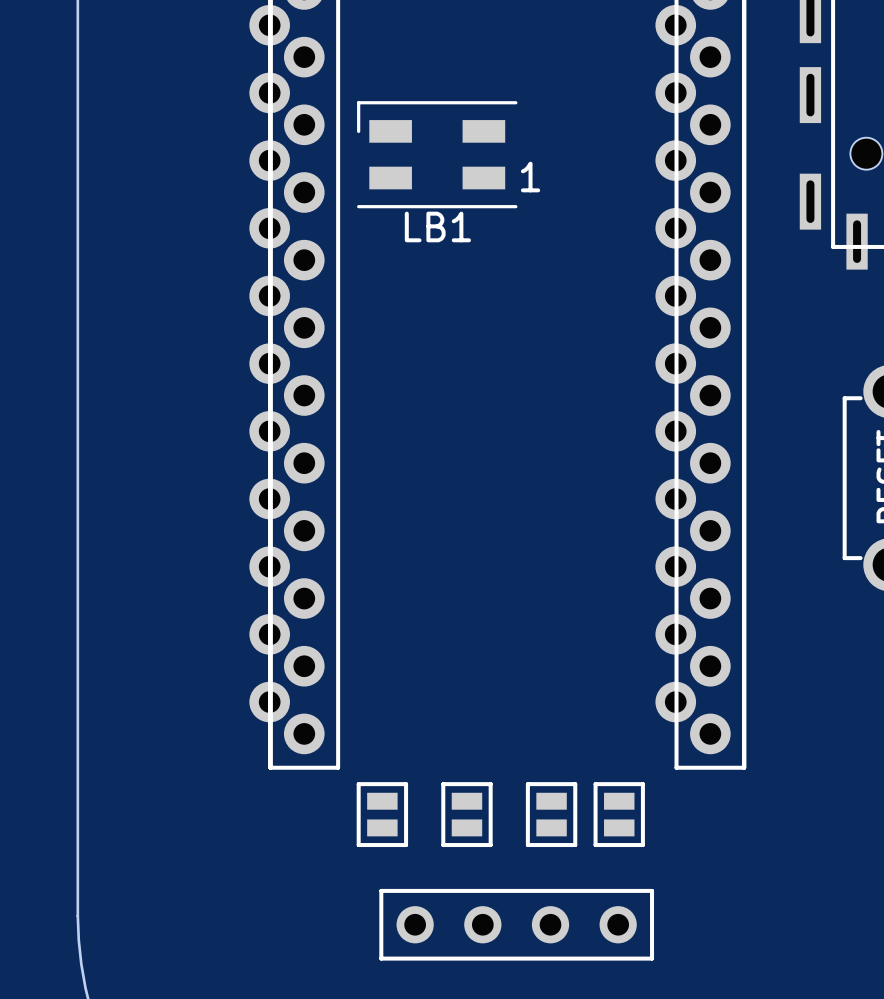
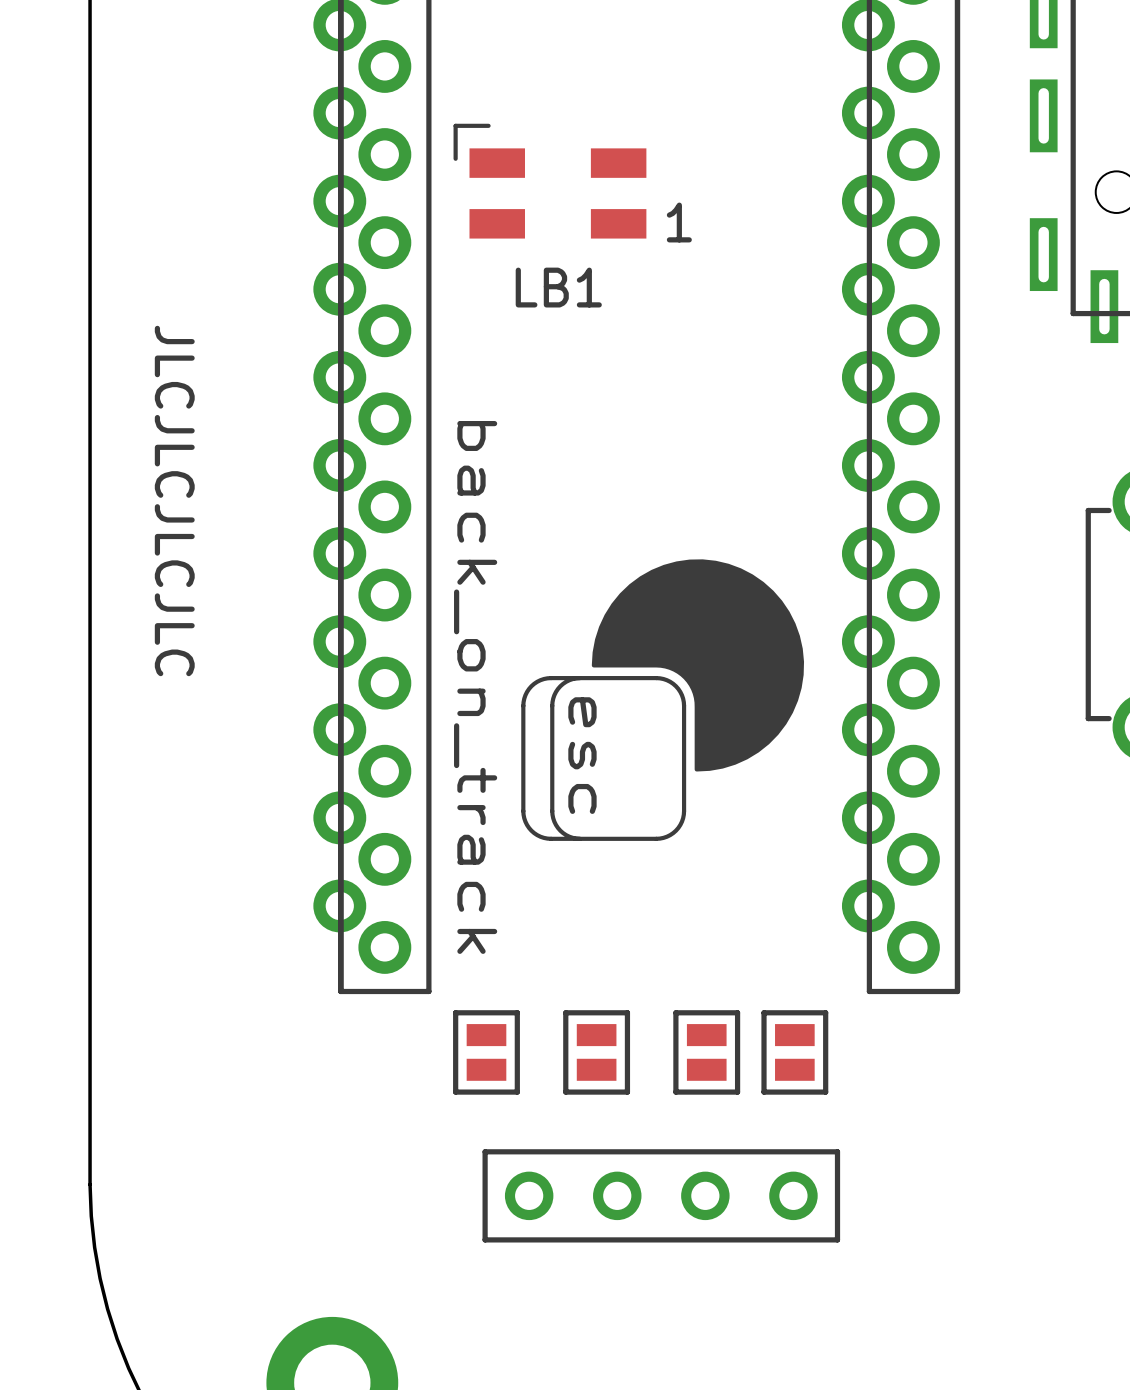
LB1 footprint: [357, 101, 518, 209] -> [453, 123, 647, 239]
JLCJLCJLCJLC: none -> (174, 500)
esc: none -> (662, 700)

